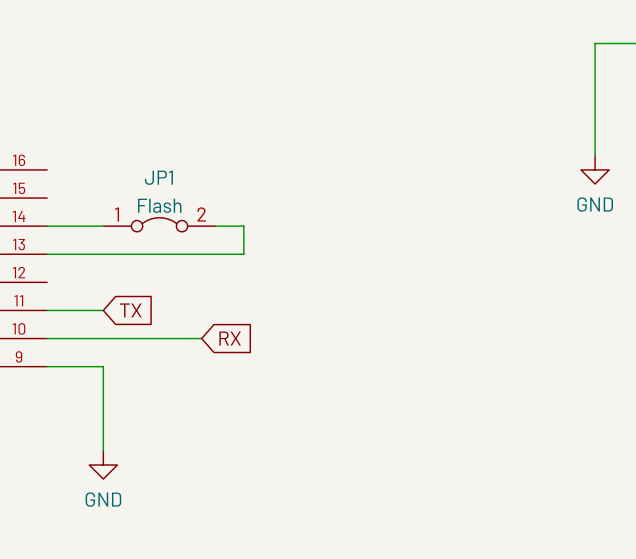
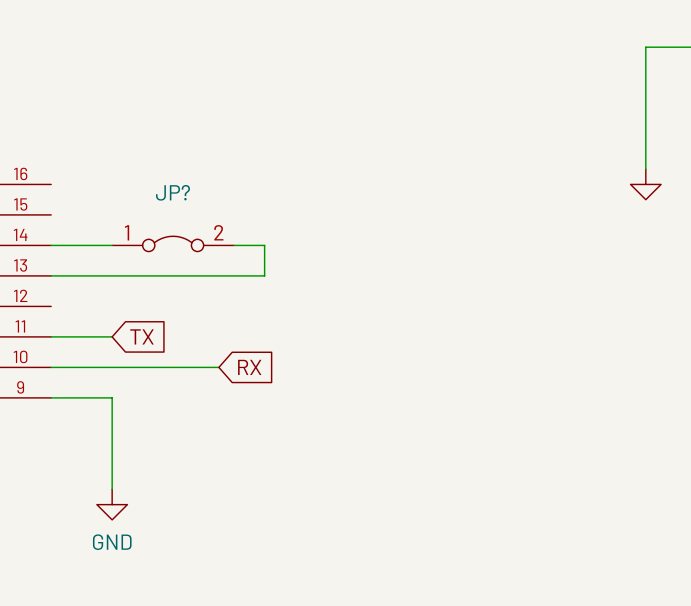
JP1 name: JP1 (158, 177) -> JP? (172, 192)
power symbol text: GND (595, 204) -> none
JP1 value: Flash (159, 205) -> none

